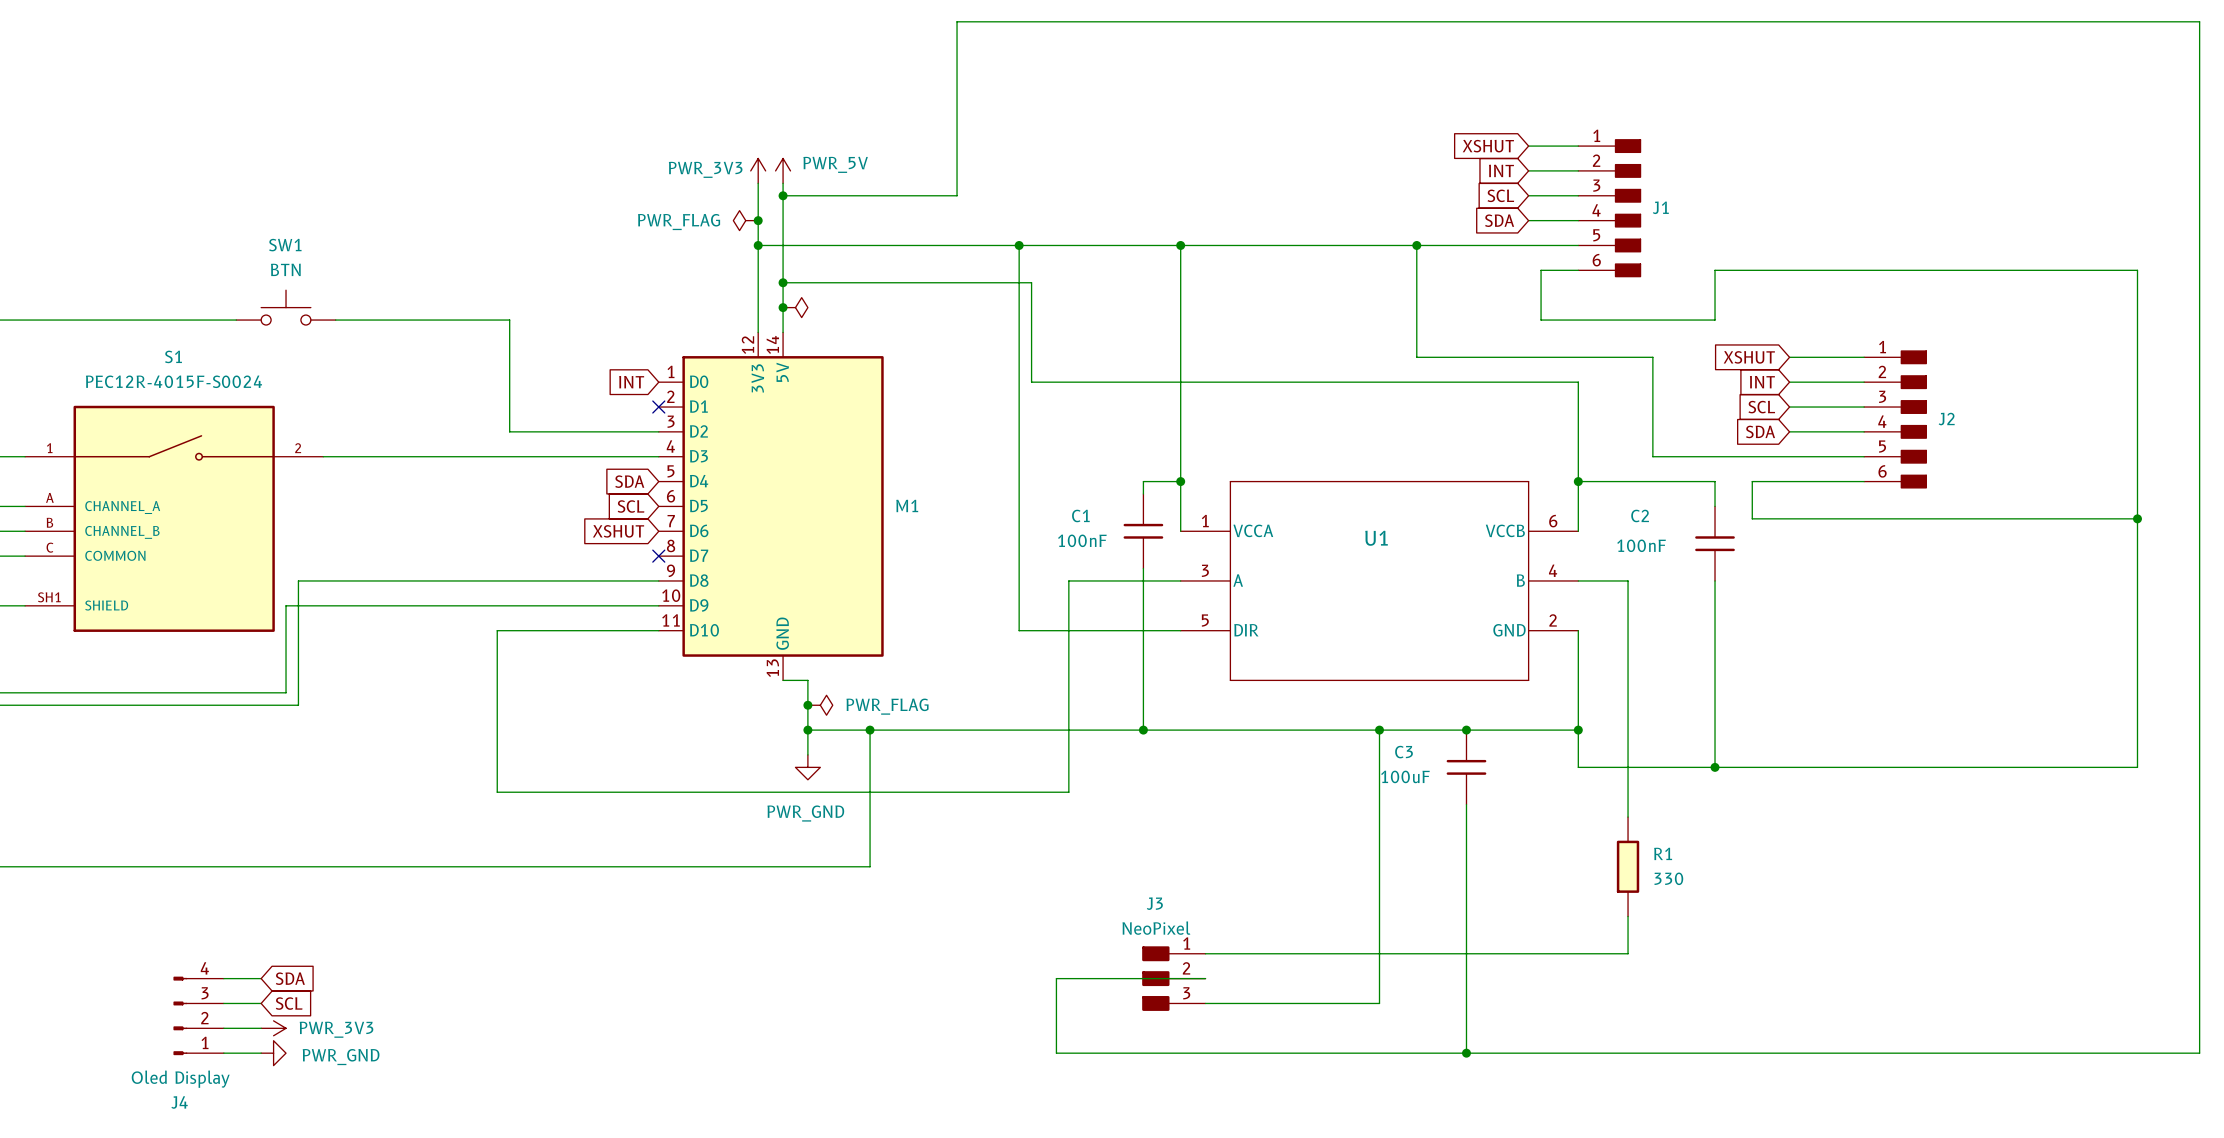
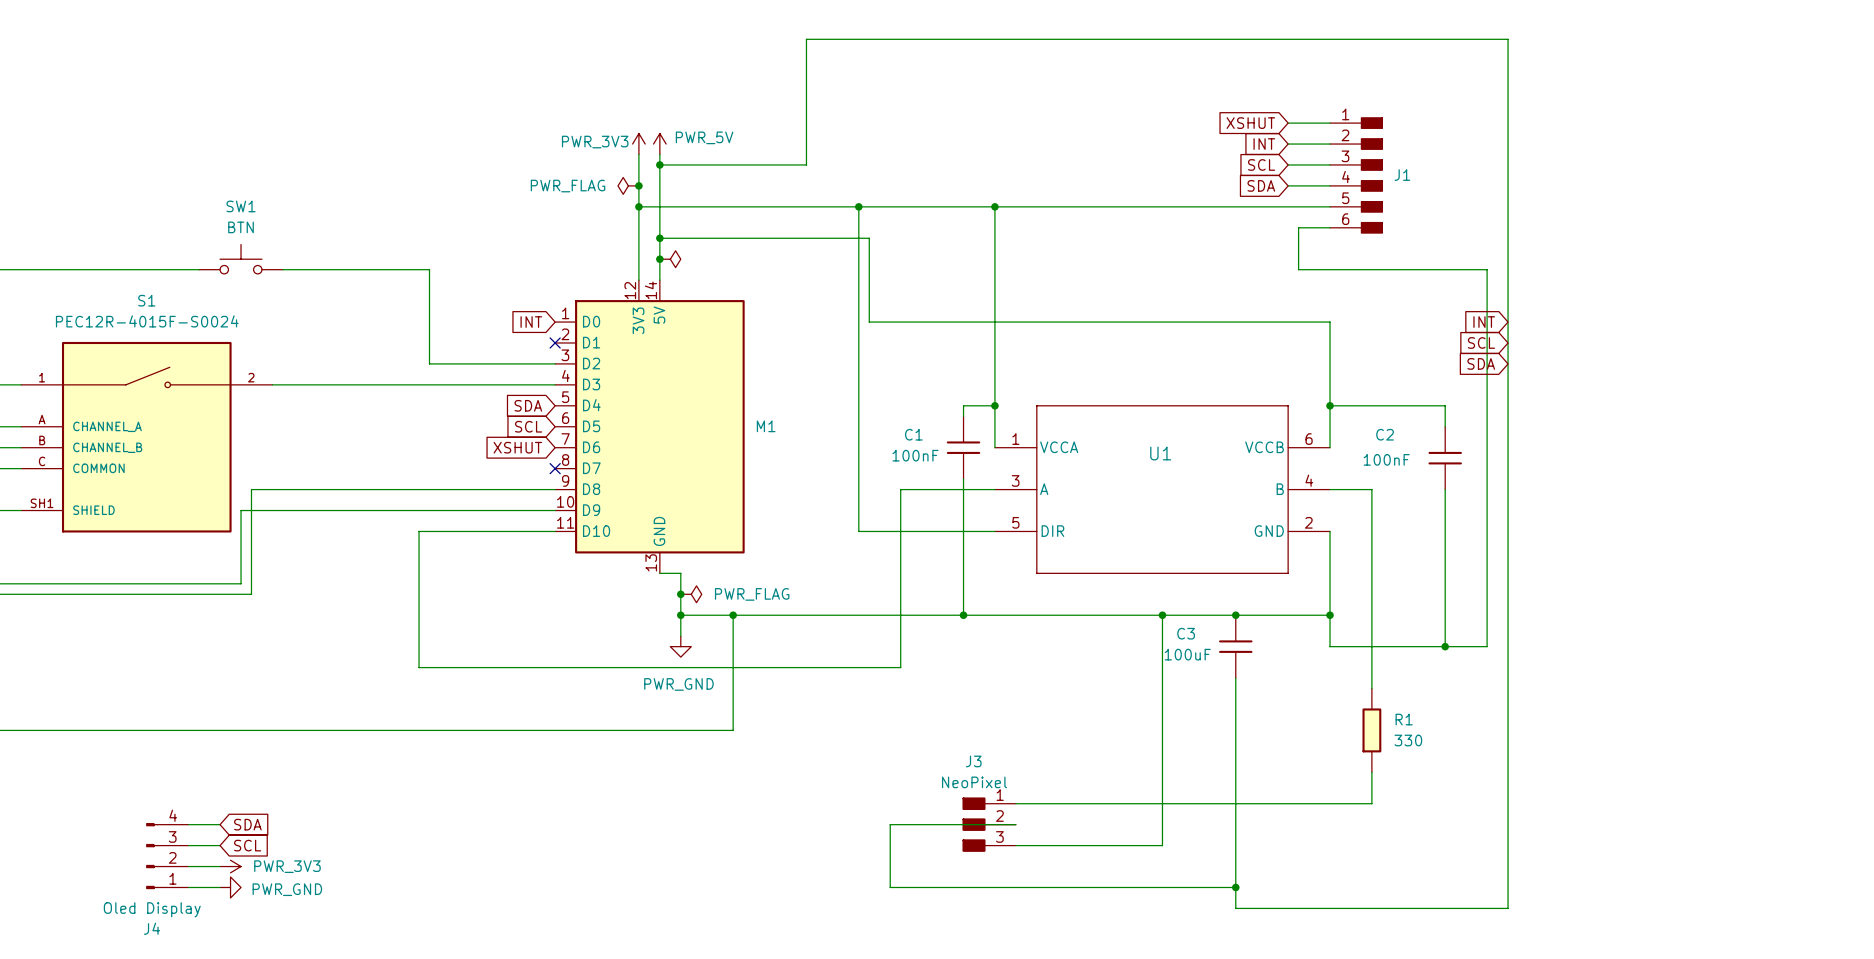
wire: (957, 46) (957, 21) (2199, 21) (2199, 1053) (1466, 1053) -> (806, 39) (1508, 39) (1508, 908) (1235, 908) (1235, 887)
wire: (1416, 245) (1416, 357) (1652, 357) (1652, 456) (1864, 456) -> none
junction: (1416, 245) -> none
wire: (1715, 320) (1715, 270) (2137, 270) (2137, 767) (1764, 767) -> (1445, 269) (1487, 269) (1487, 646)
global label: XSHUT (1749, 357) -> none
wire: (1789, 357) (1864, 357) -> none
wire: (1789, 382) (1864, 382) -> none
wire: (1789, 407) (1864, 407) -> none
J2: (1895, 419) -> none
wire: (1789, 431) (1864, 431) -> none
wire: (1864, 481) (1752, 481) (1752, 518) (2137, 518) -> none
junction: (2137, 518) -> none

